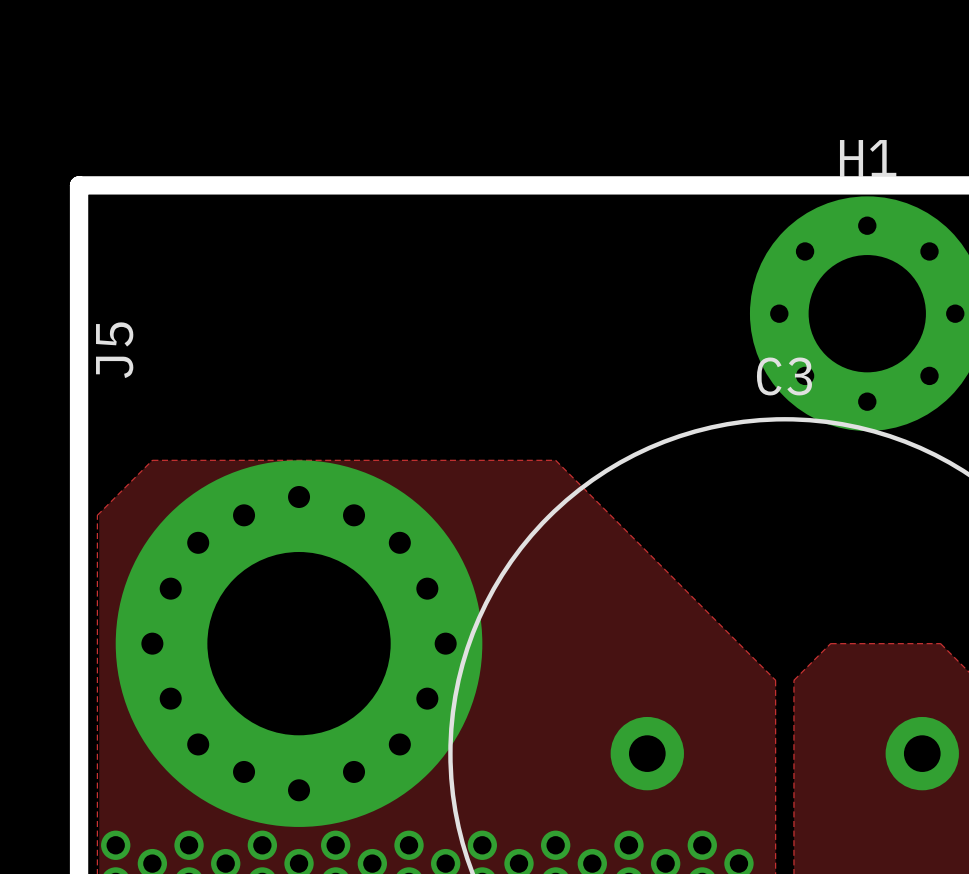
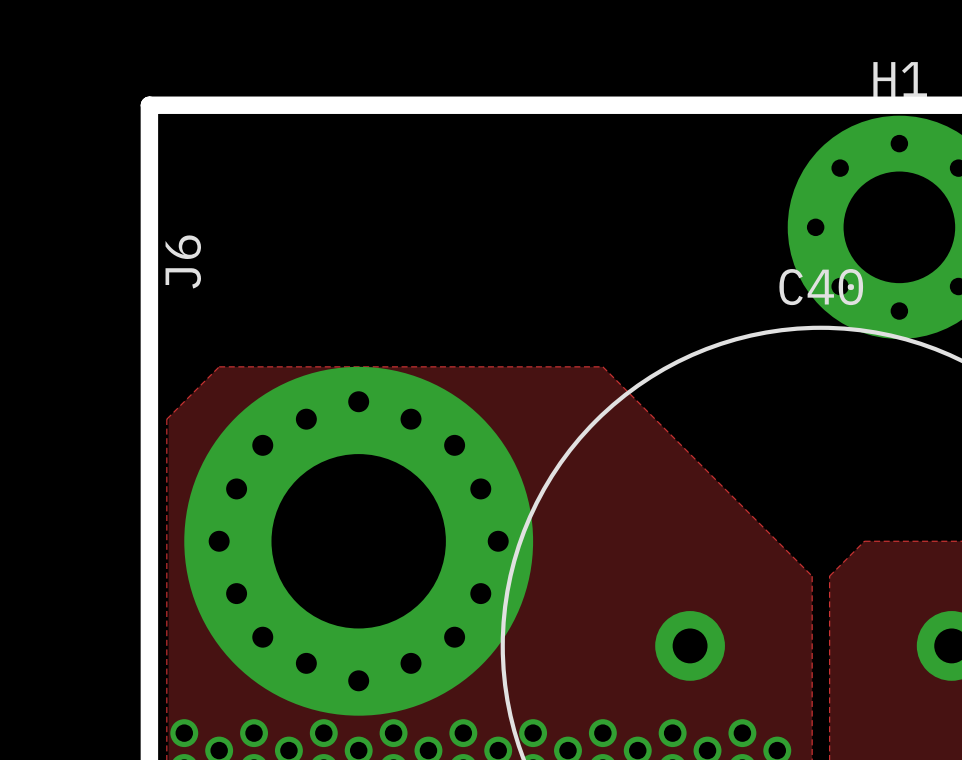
J5 name: J5 (114, 350) -> J6 (183, 261)
C3 name: C3 (784, 376) -> C40 (821, 287)

